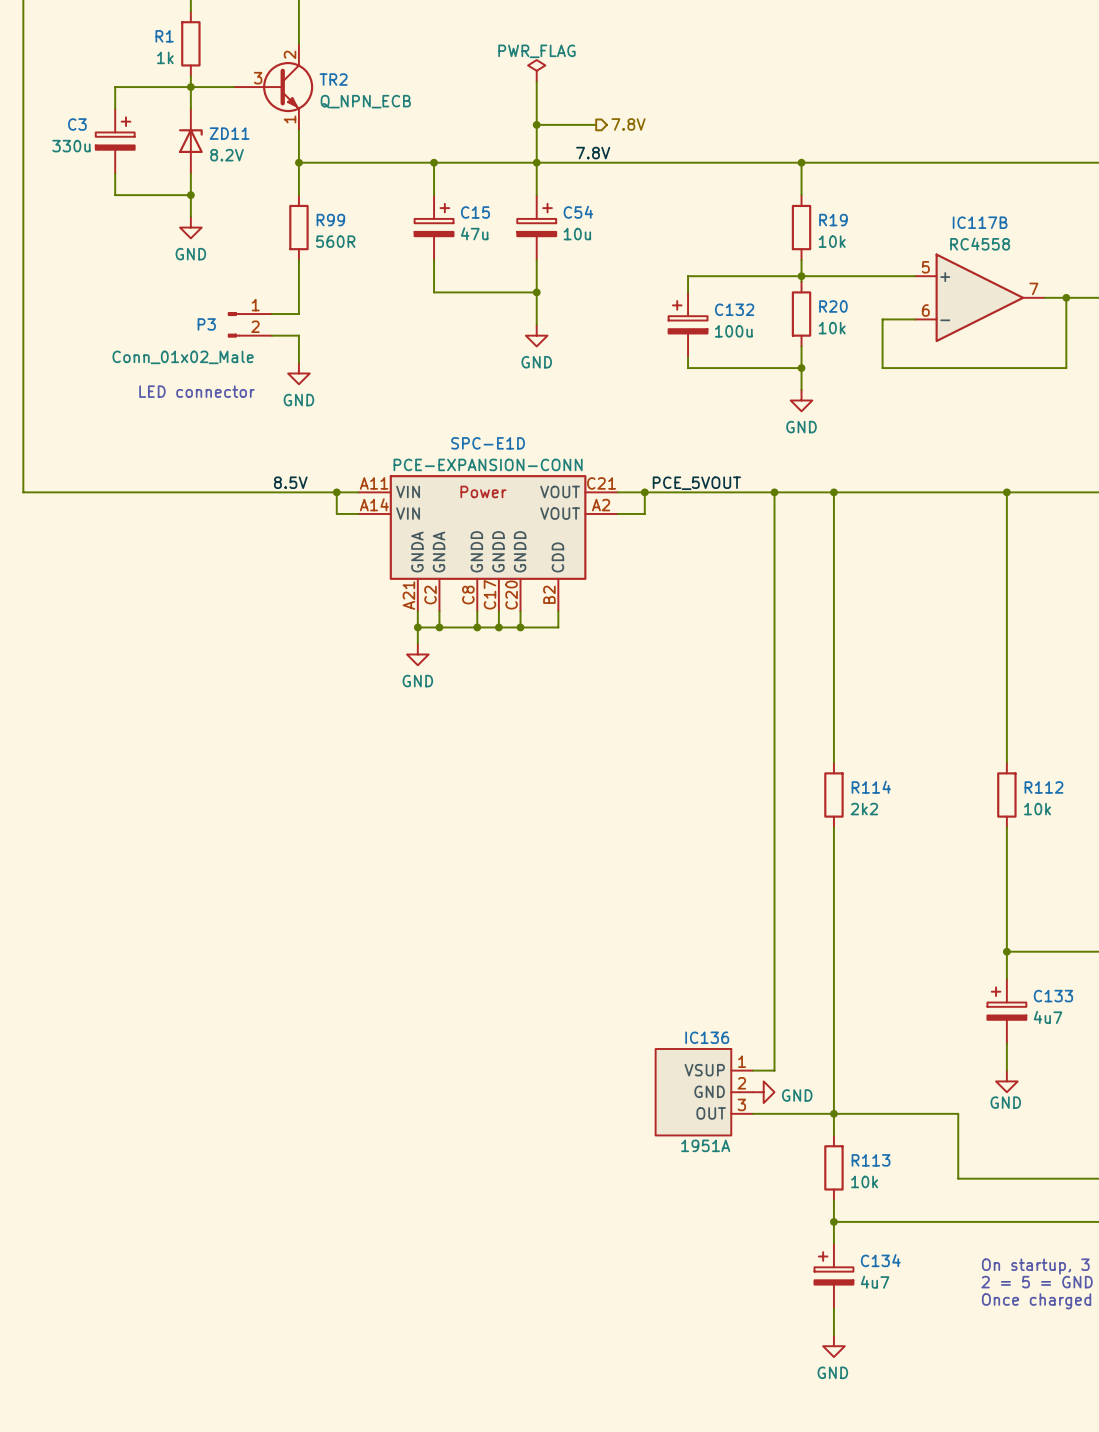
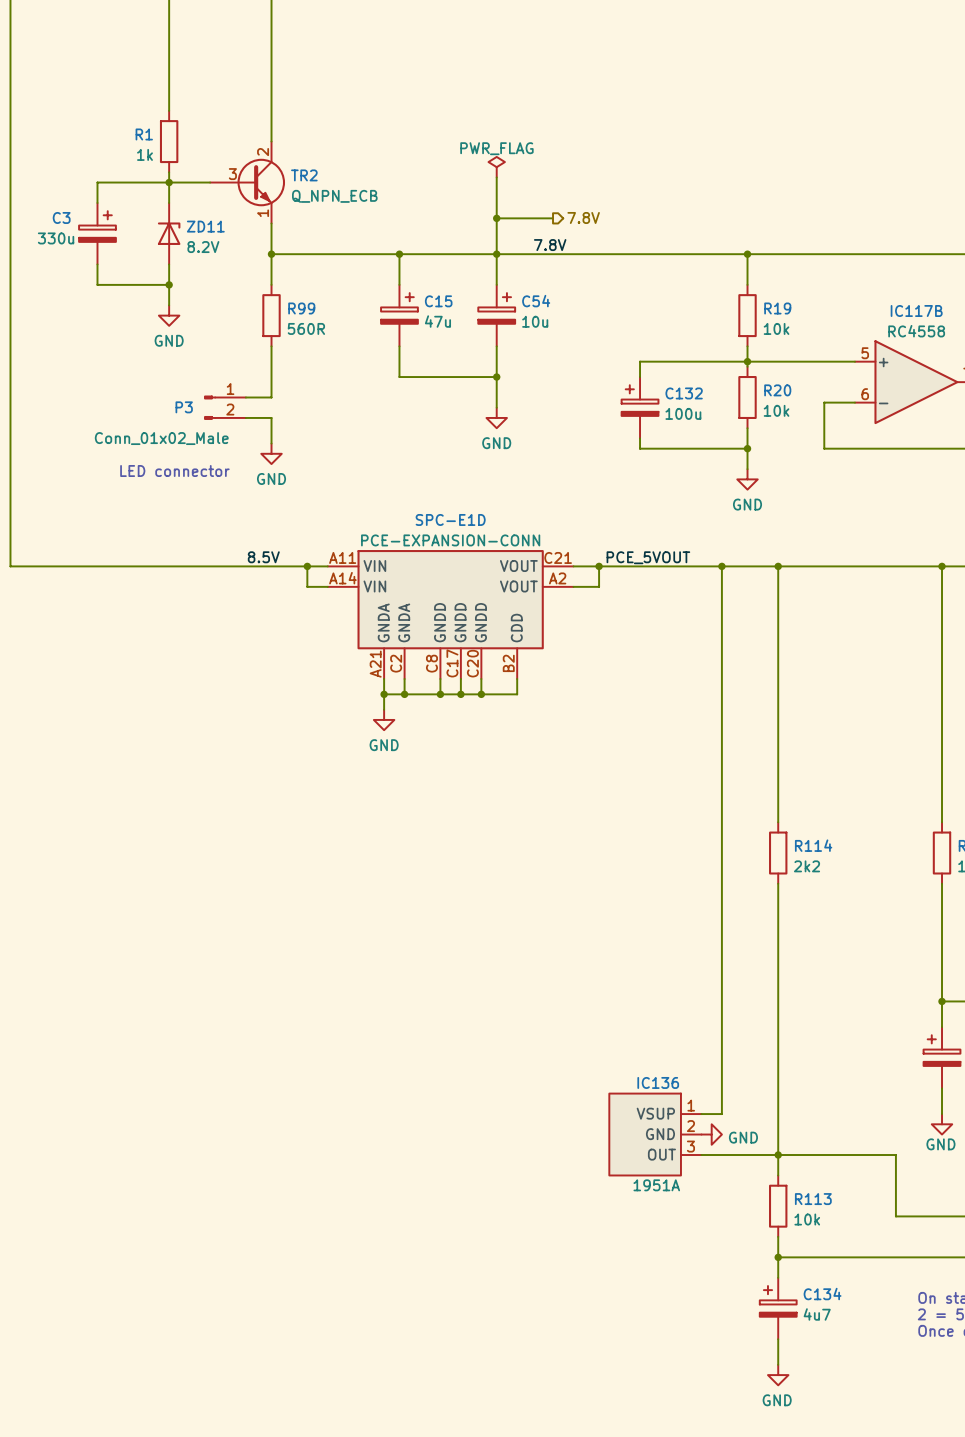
SPC-E1D text: Power (483, 491) -> none

